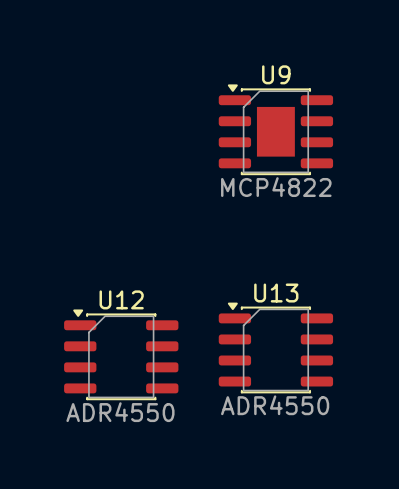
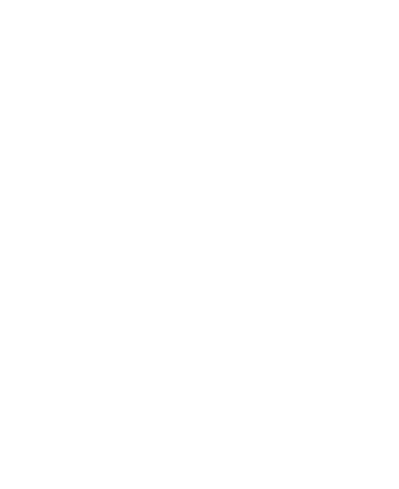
U9: MCP4822 (275, 129) -> none
U13: ADR4550 (275, 347) -> none
U12: ADR4550 (121, 354) -> none

